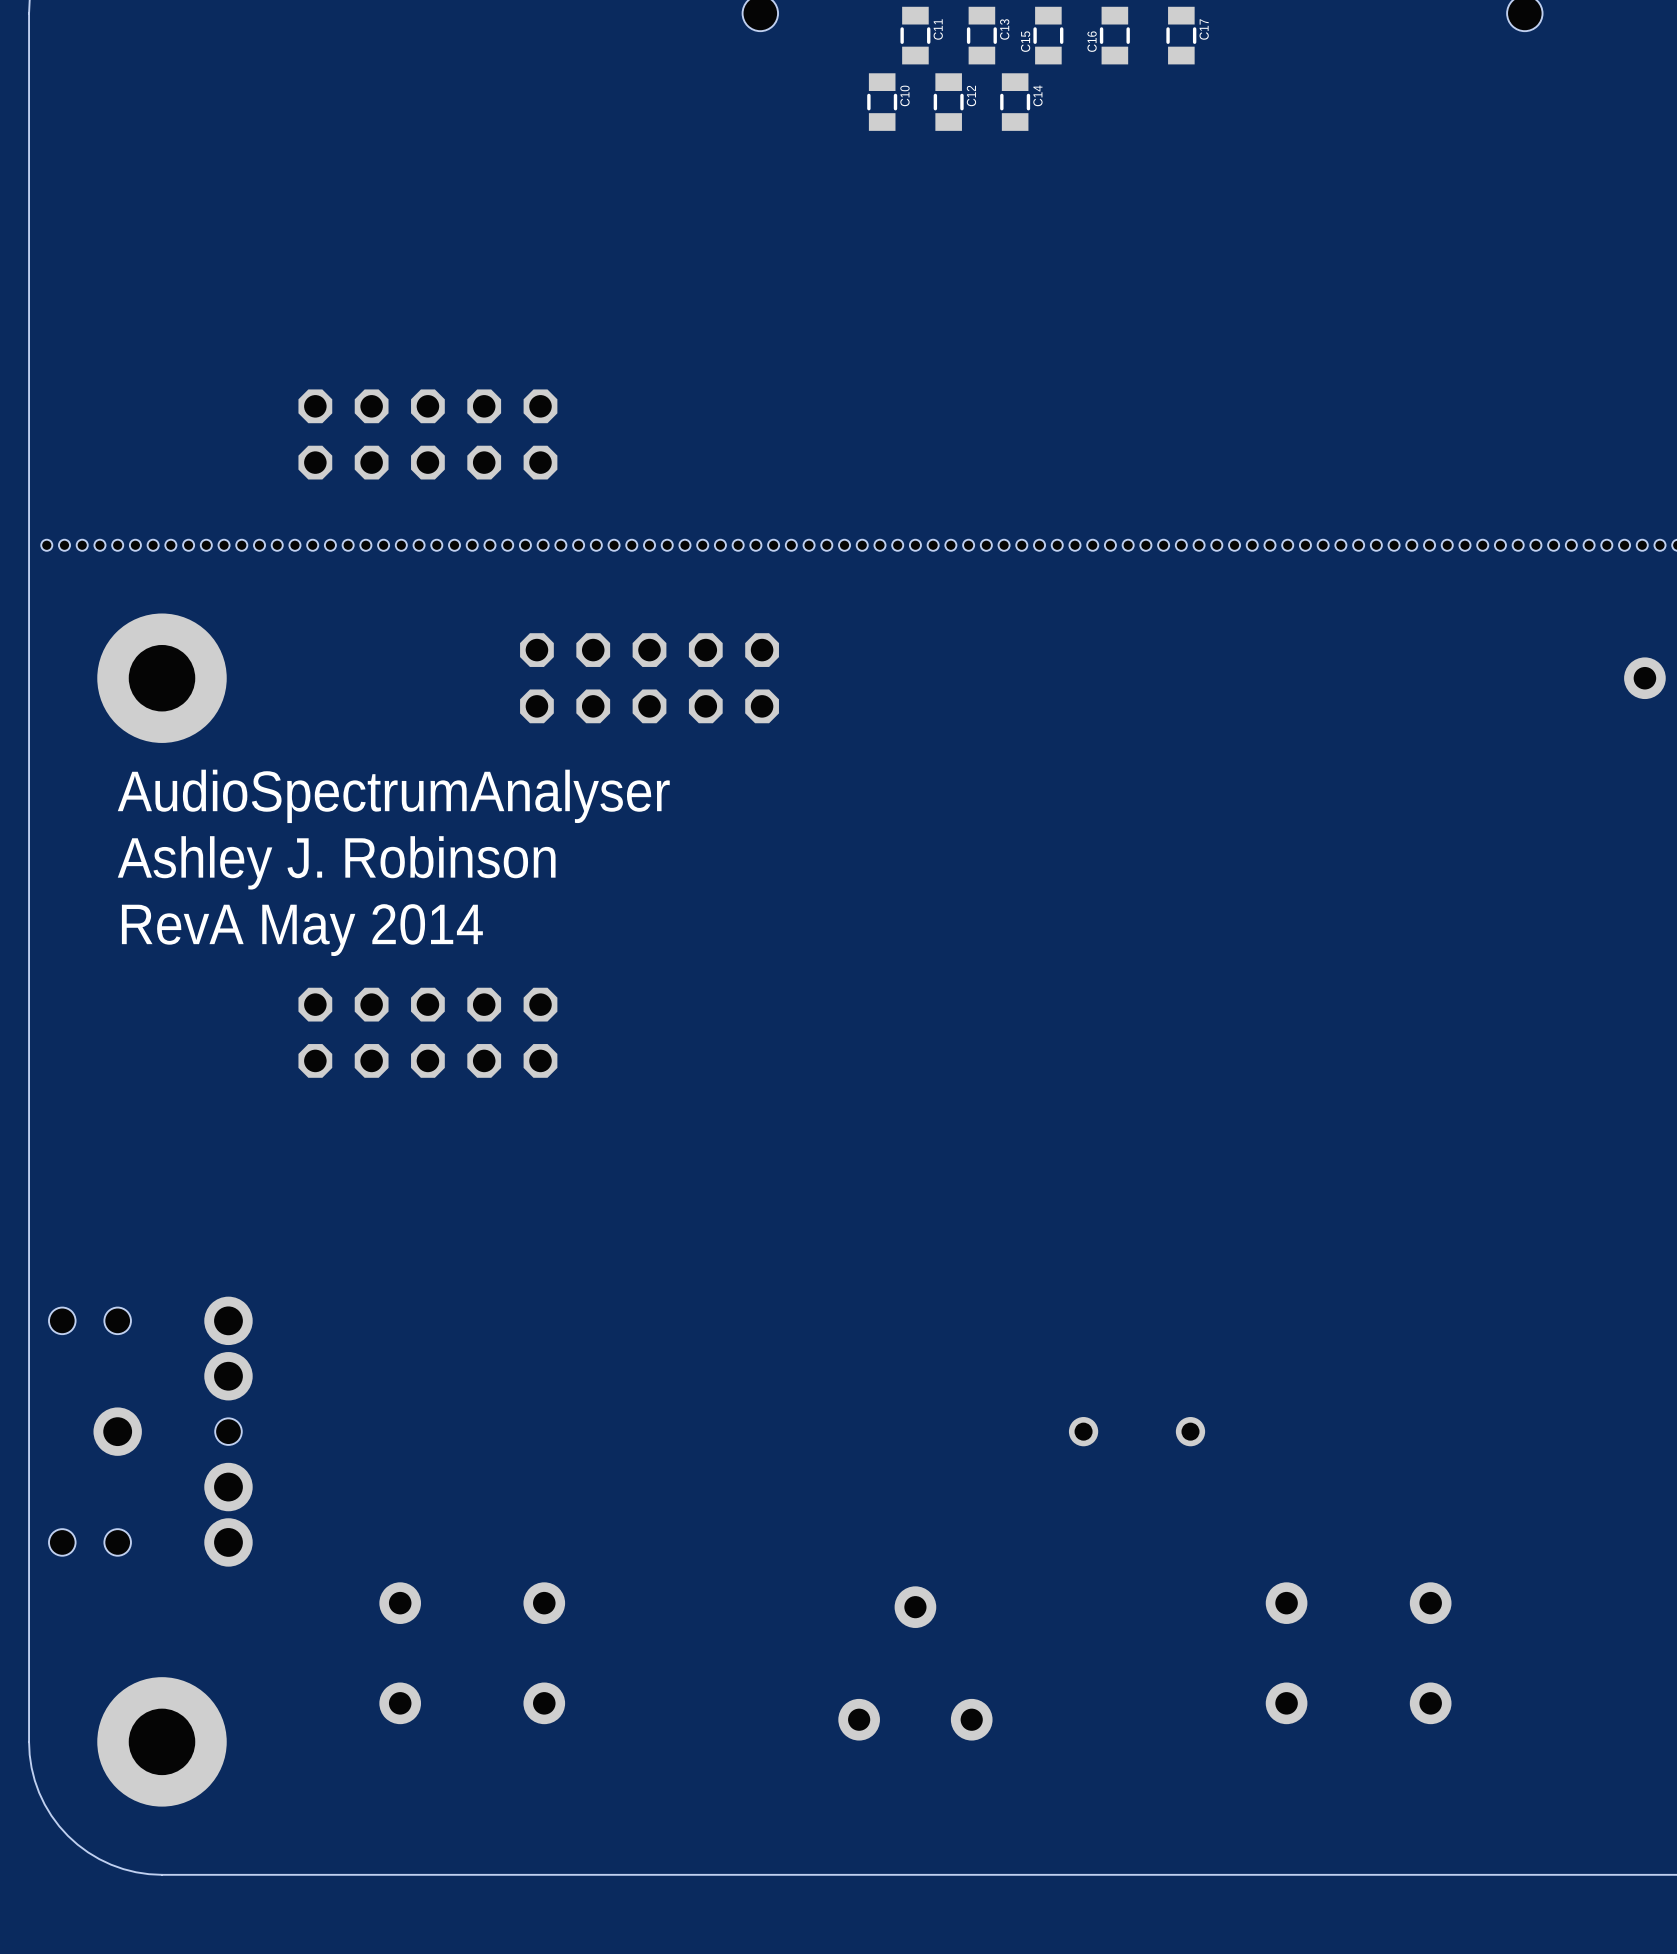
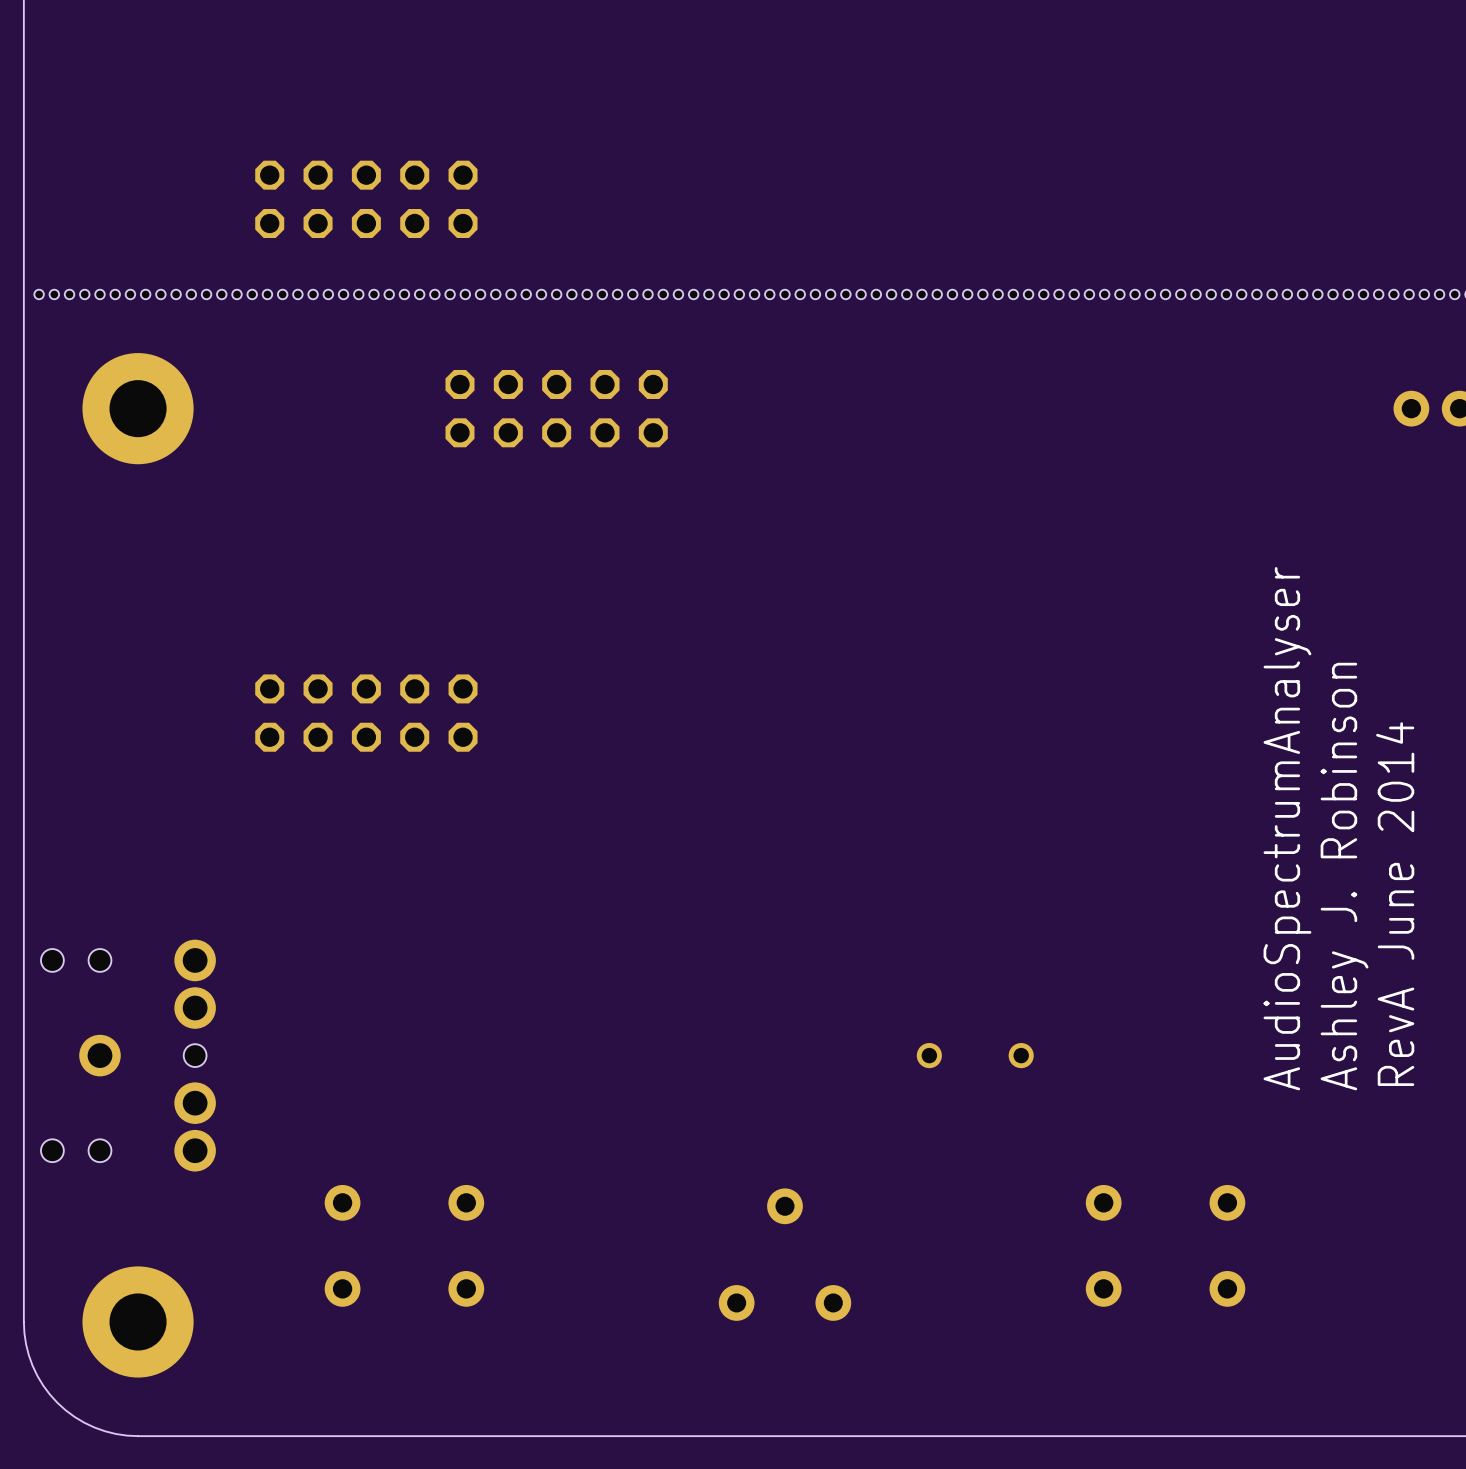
text: AudioSpectrumAnalyser (393, 796) -> none
text: Ashley J. Robinson (336, 862) -> none
text: RevA May 2014 (302, 930) -> none
text: none -> AudioSpectrumAnalyser (1287, 828)
text: none -> Ashley J. Robinson (1344, 876)
text: none -> RevA June 2014 (1395, 904)

